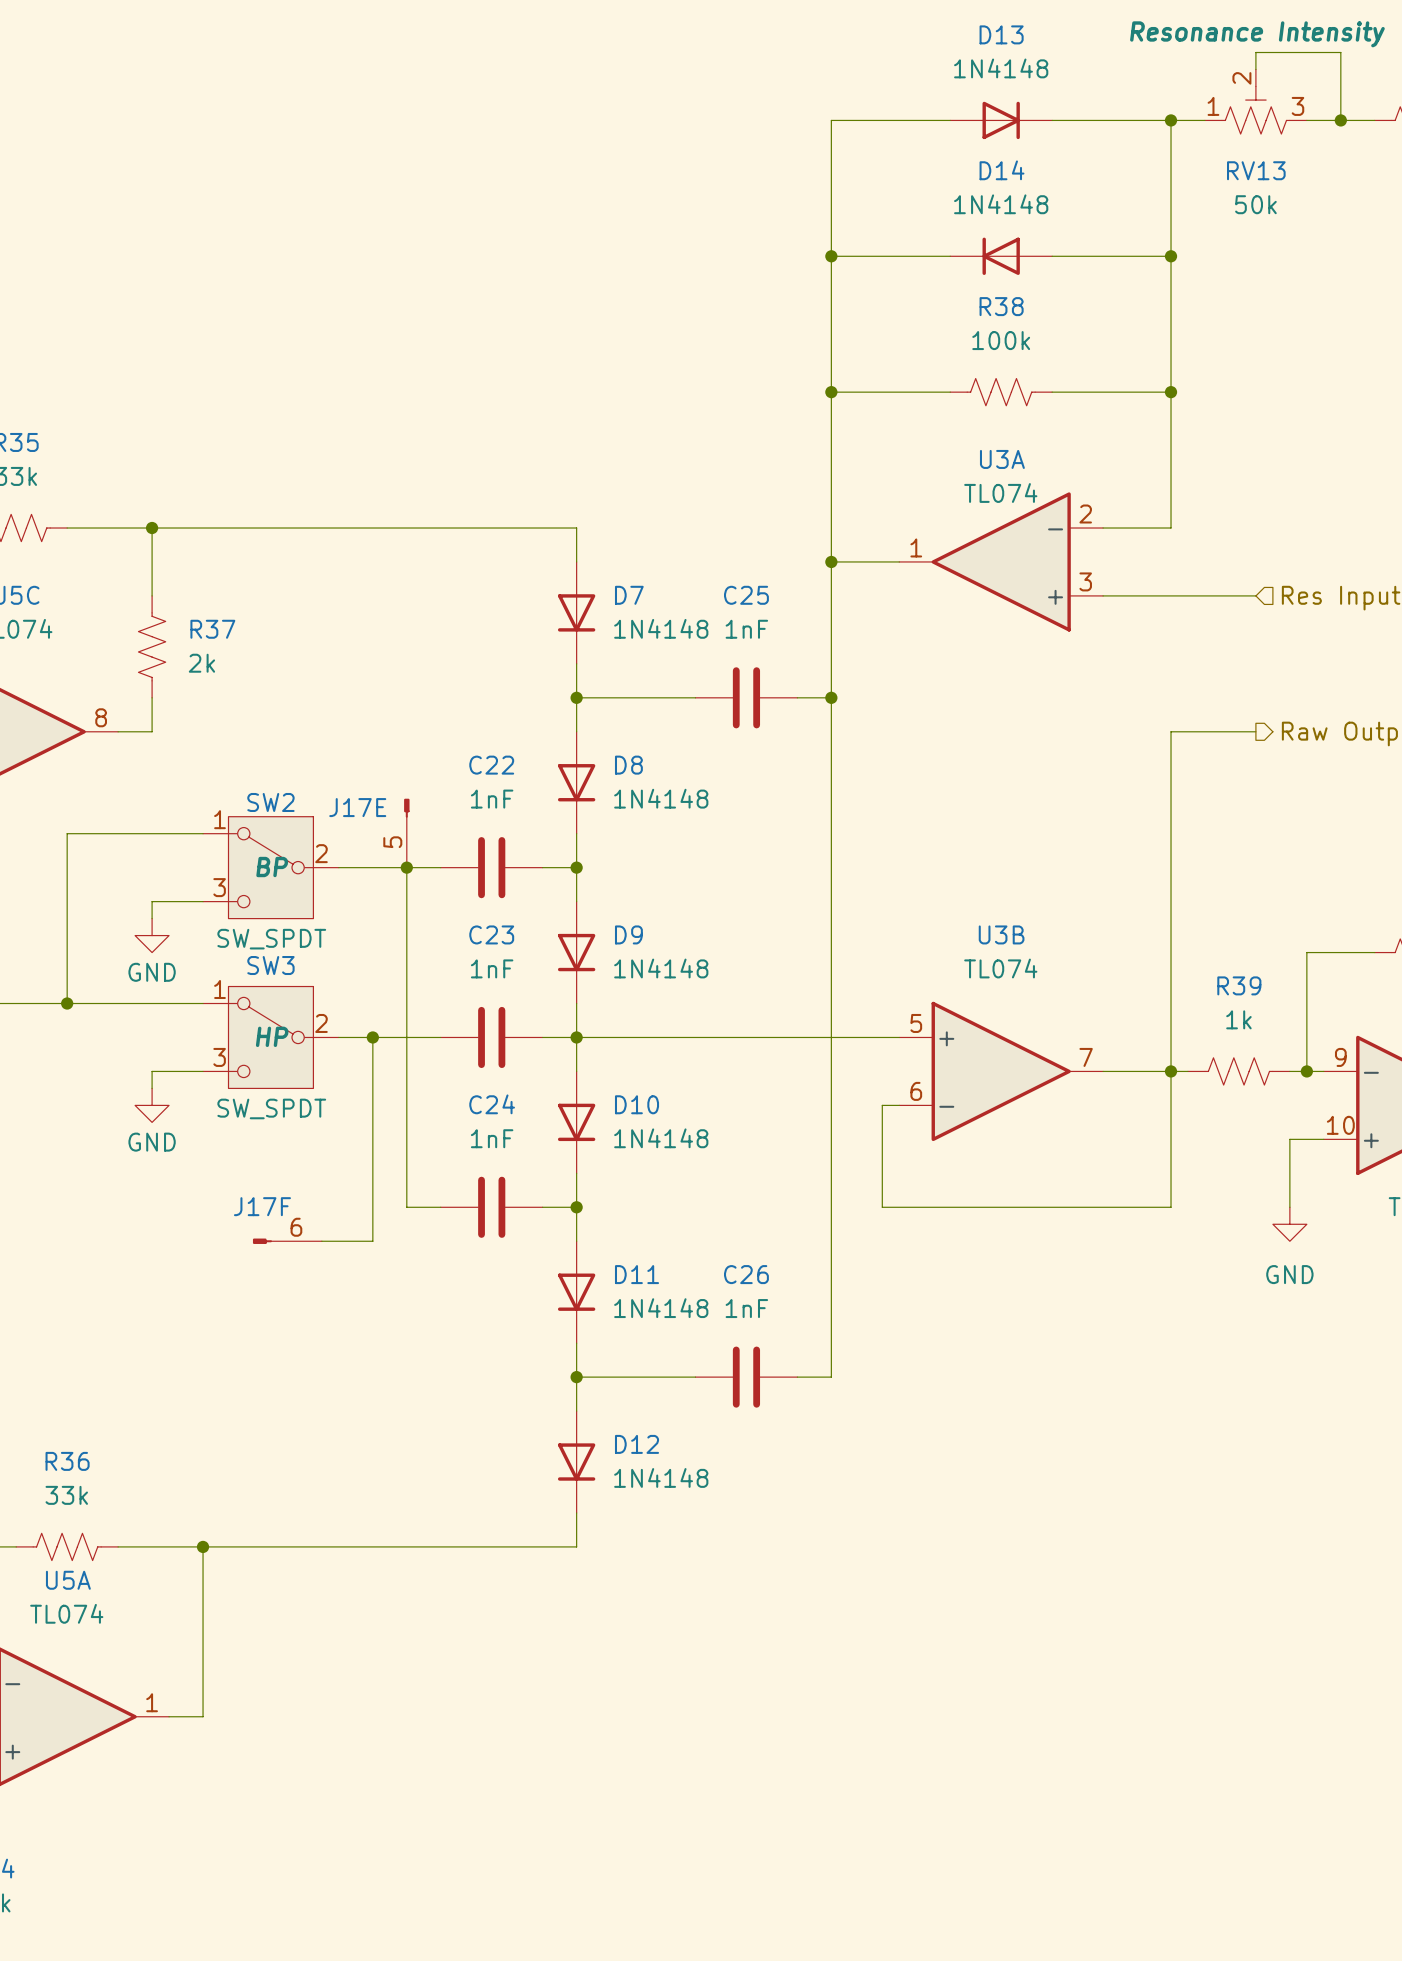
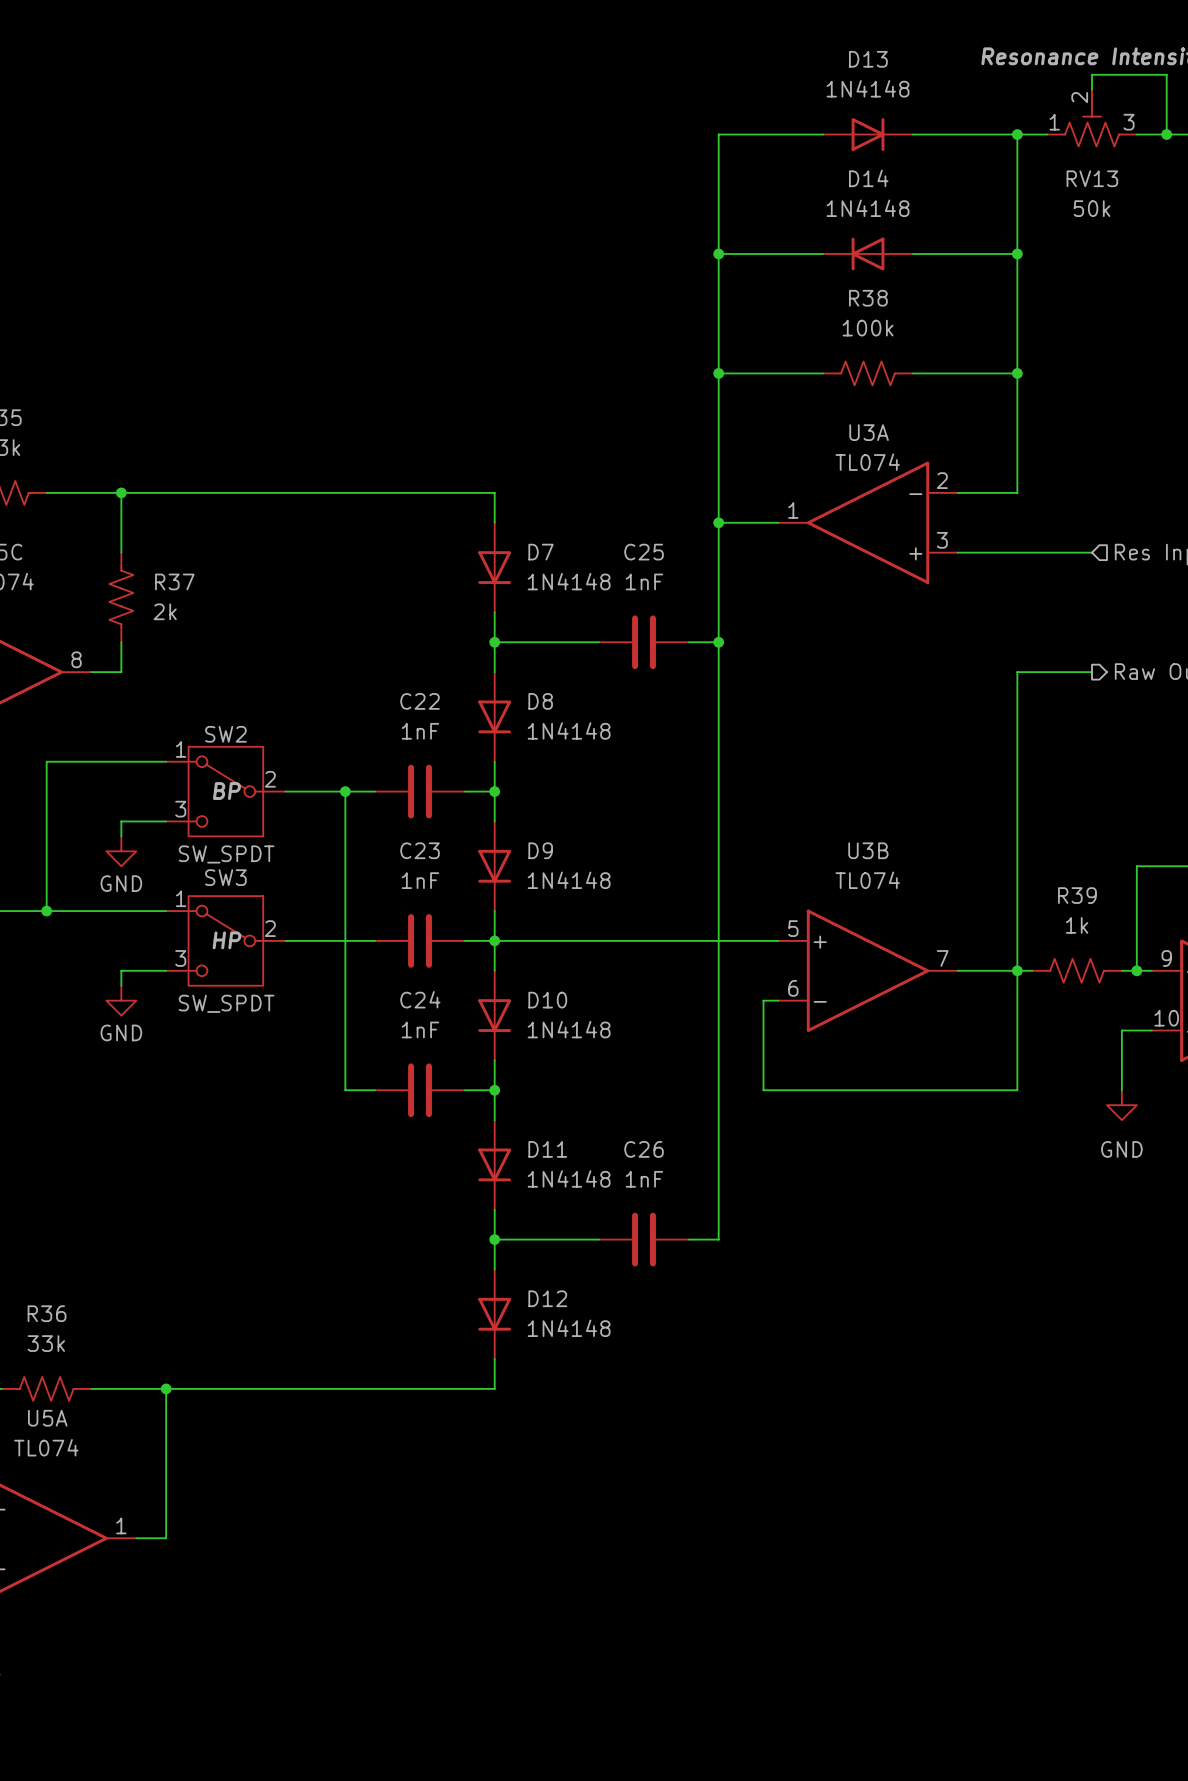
J17E: (406, 833) -> none
wire: (372, 1037) (372, 1241) (321, 1241) -> none
junction: (372, 1037) -> none
J17F: (287, 1241) -> none

